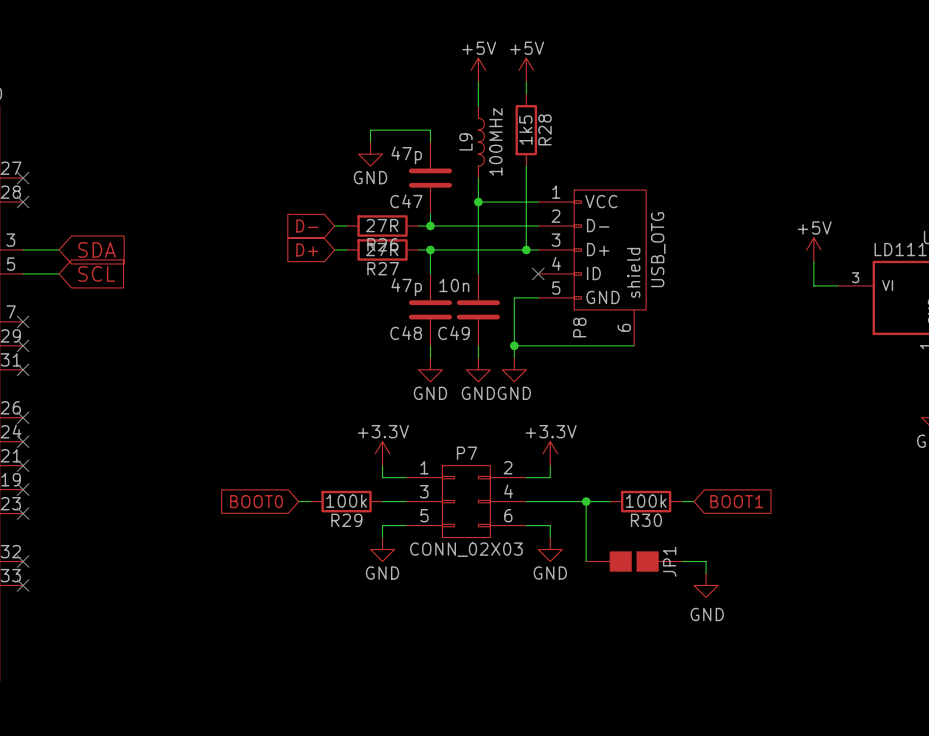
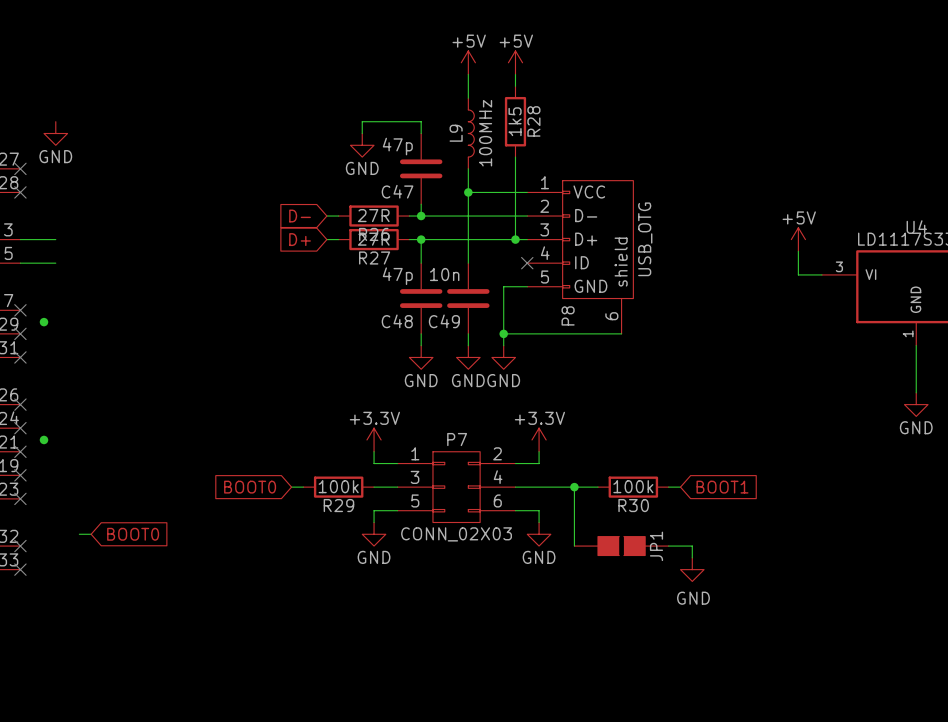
power symbol: none -> GND (55, 133)
global label: SDA (97, 249) -> none
global label: SCL (96, 273) -> none
junction: none -> (44, 322)
junction: none -> (44, 439)
wire: none -> (79, 534) (91, 534)
global label: none -> BOOT0 (133, 534)

